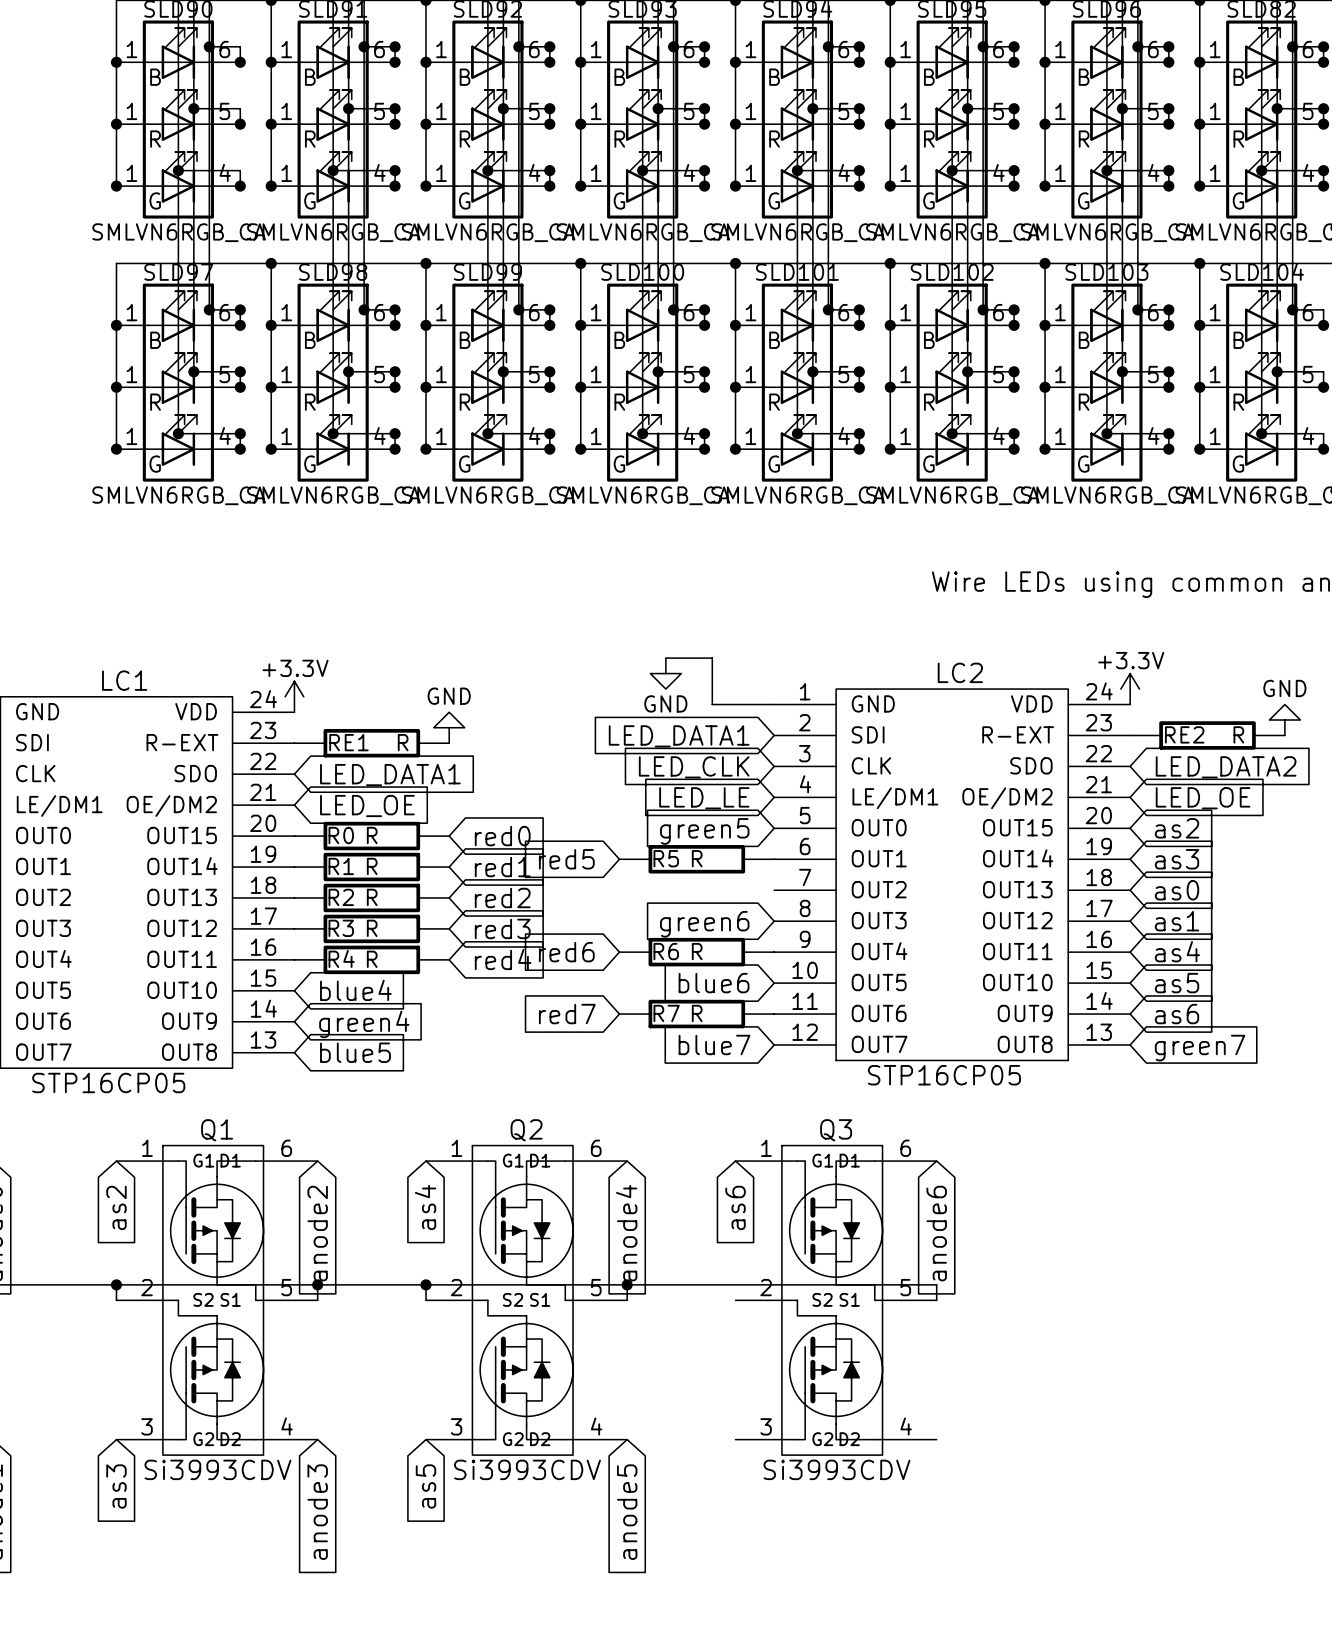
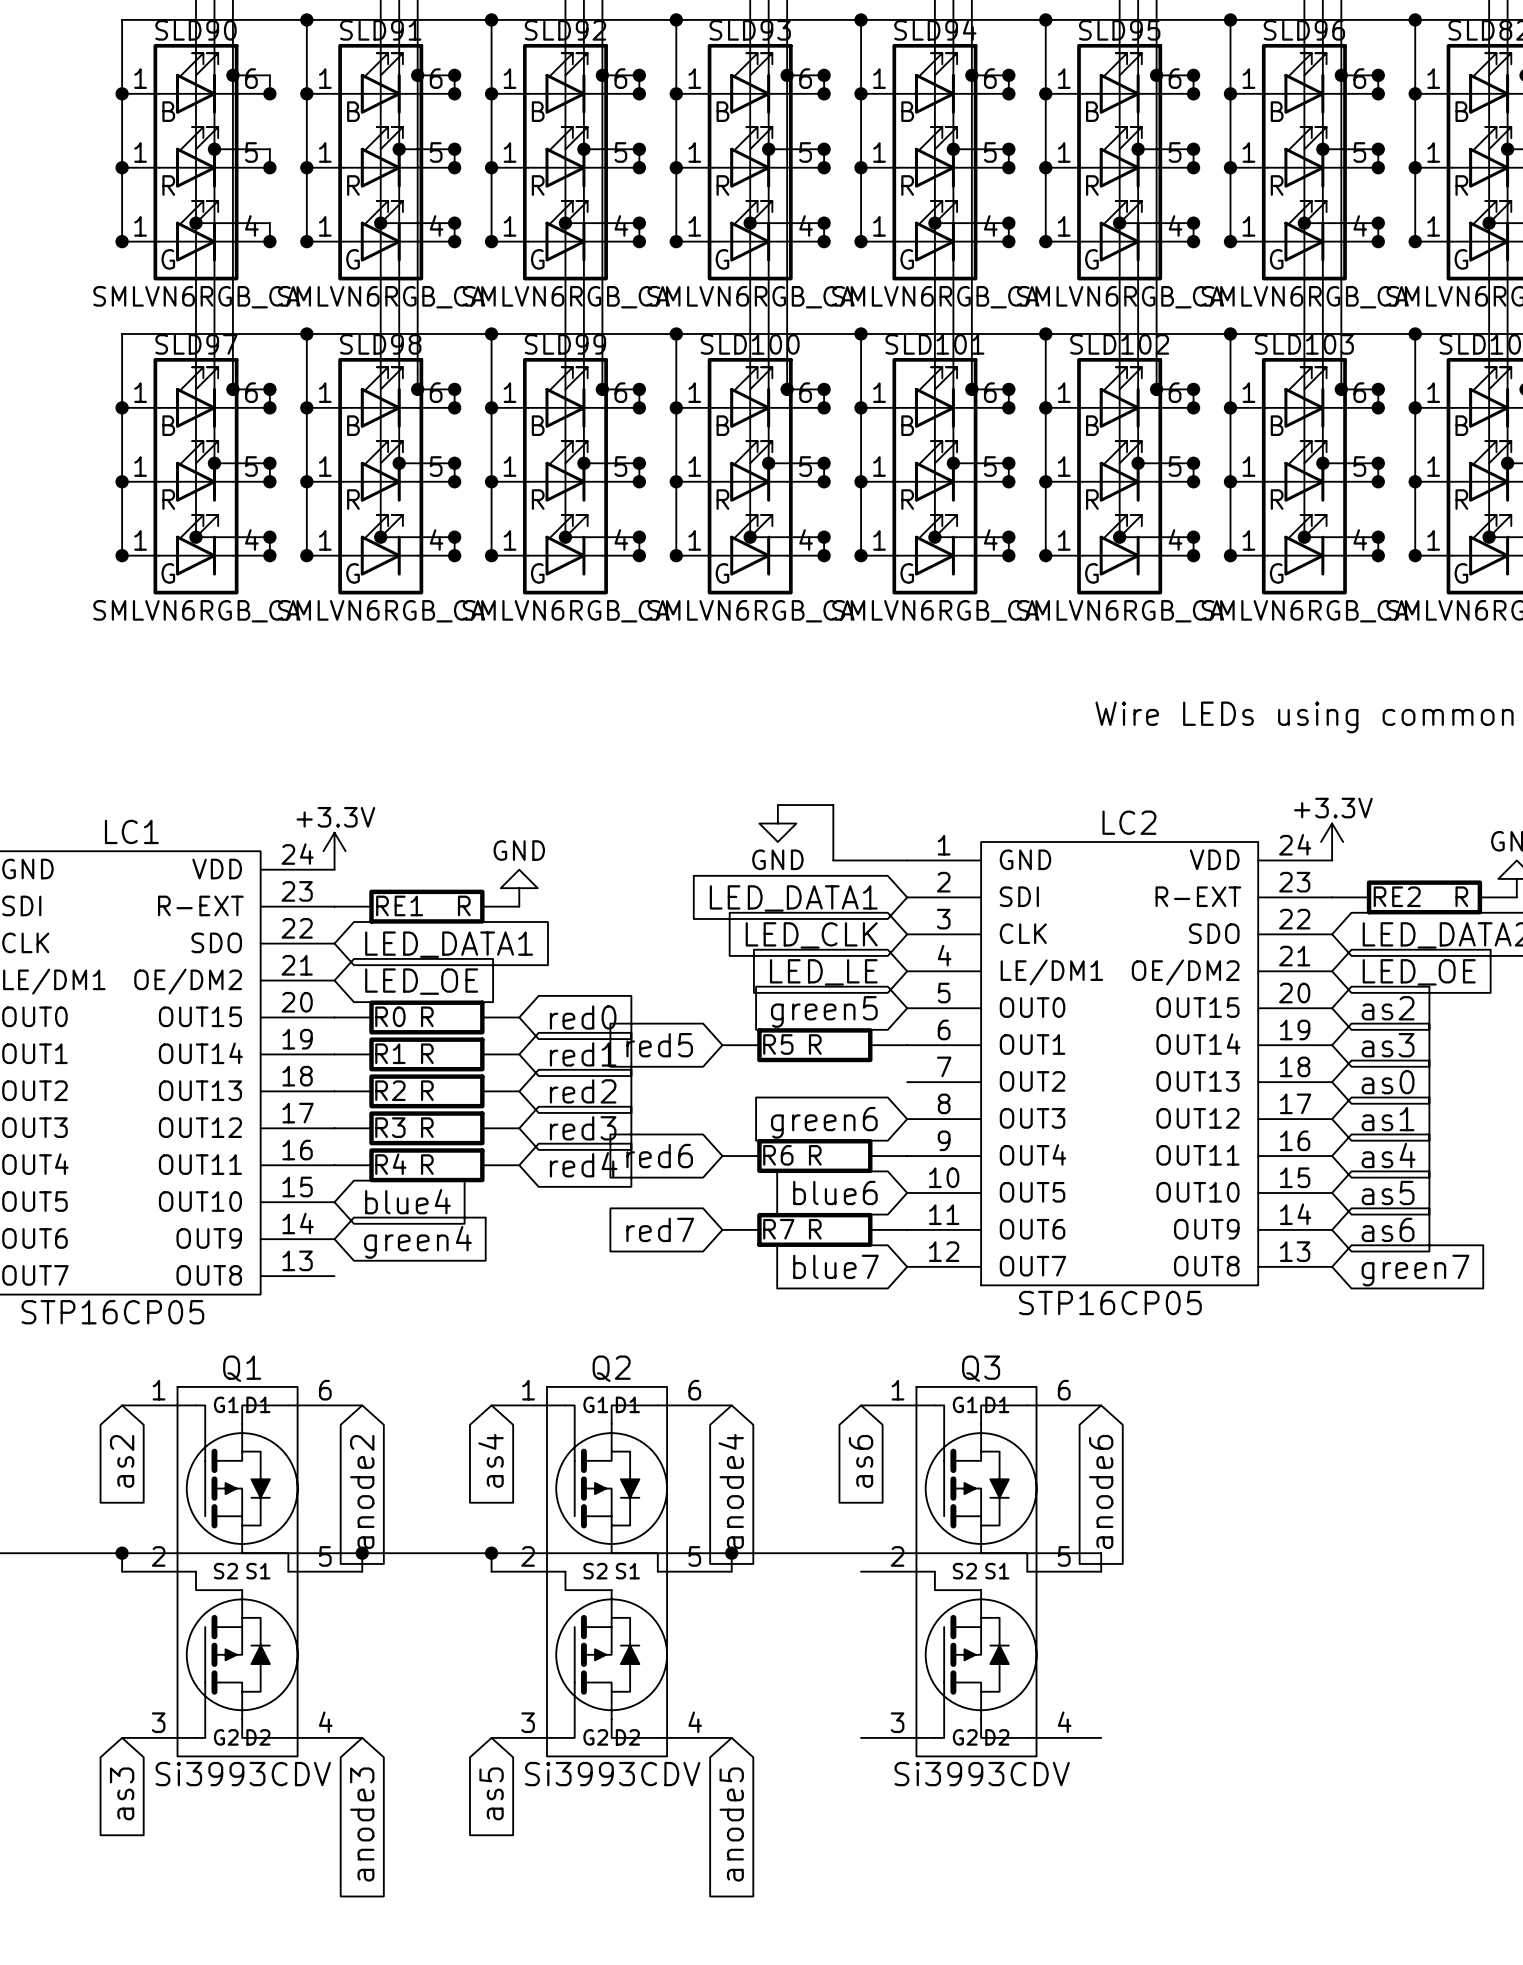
global label: blue5 (355, 1052) -> none

